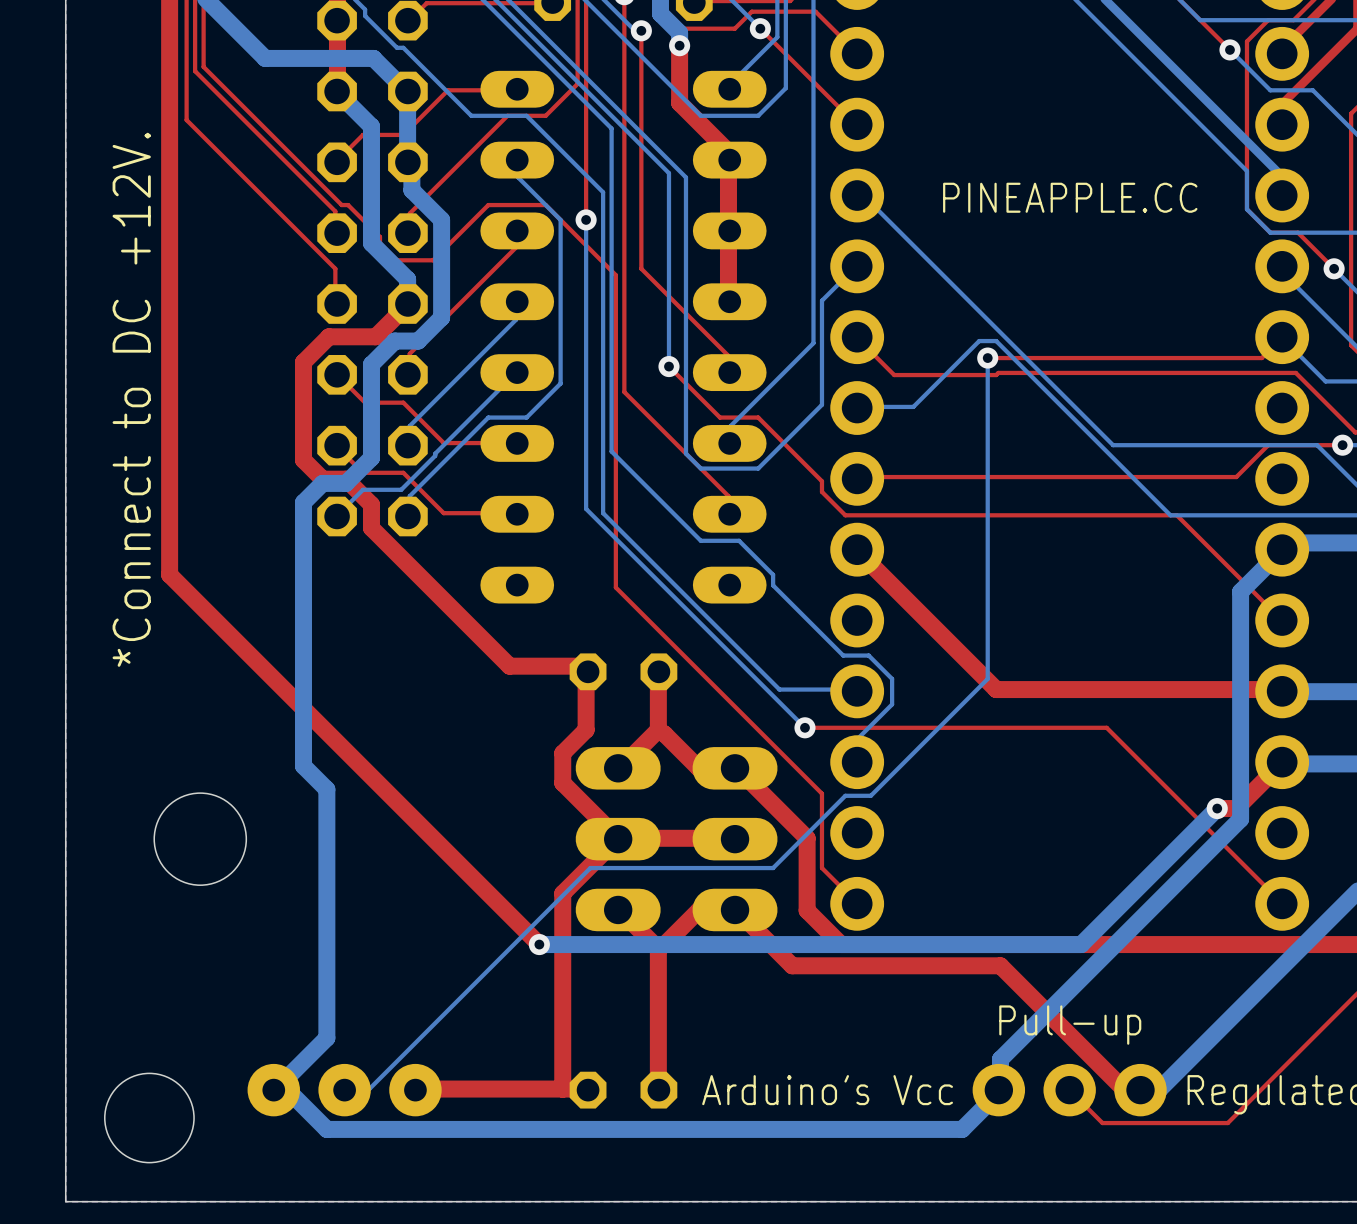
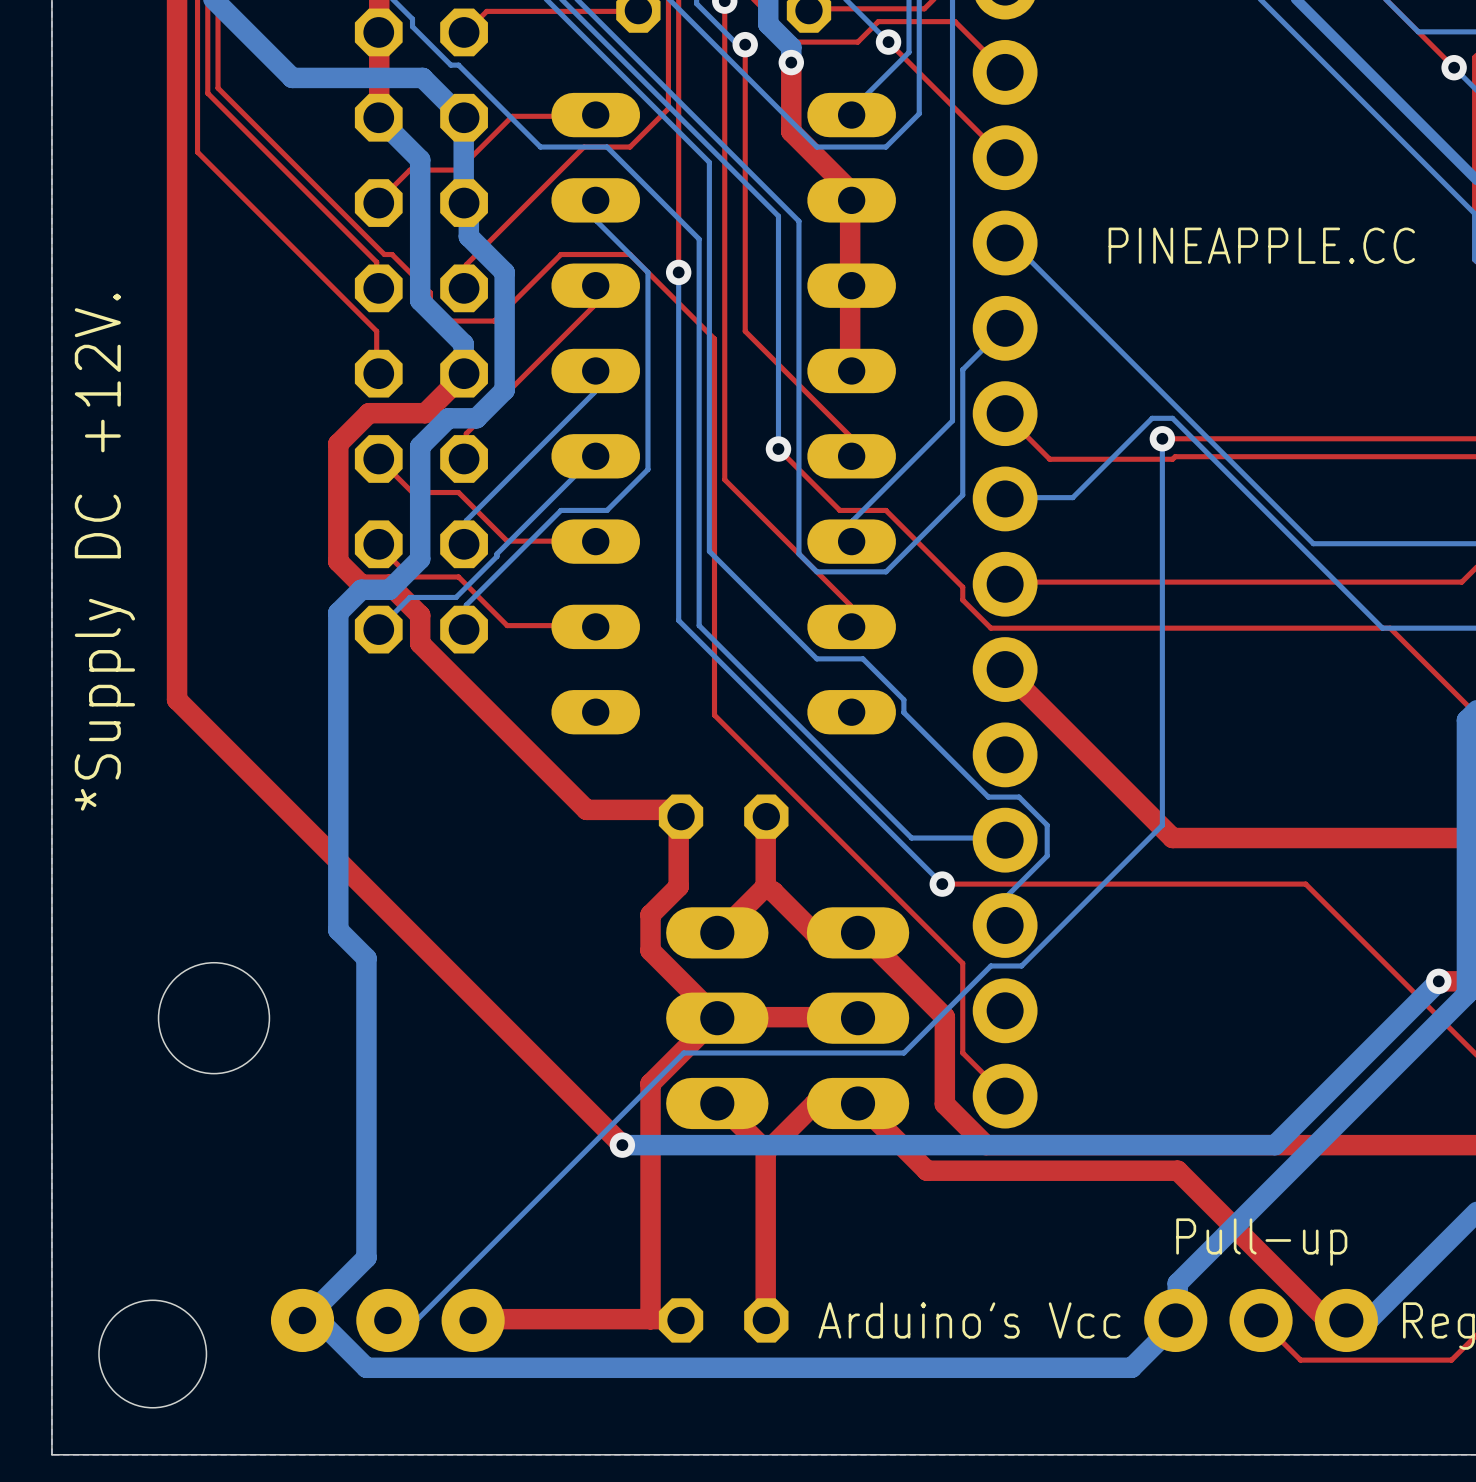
text: *Connect to DC +12V. (131, 399) -> *Supply DC +12V. (104, 552)

